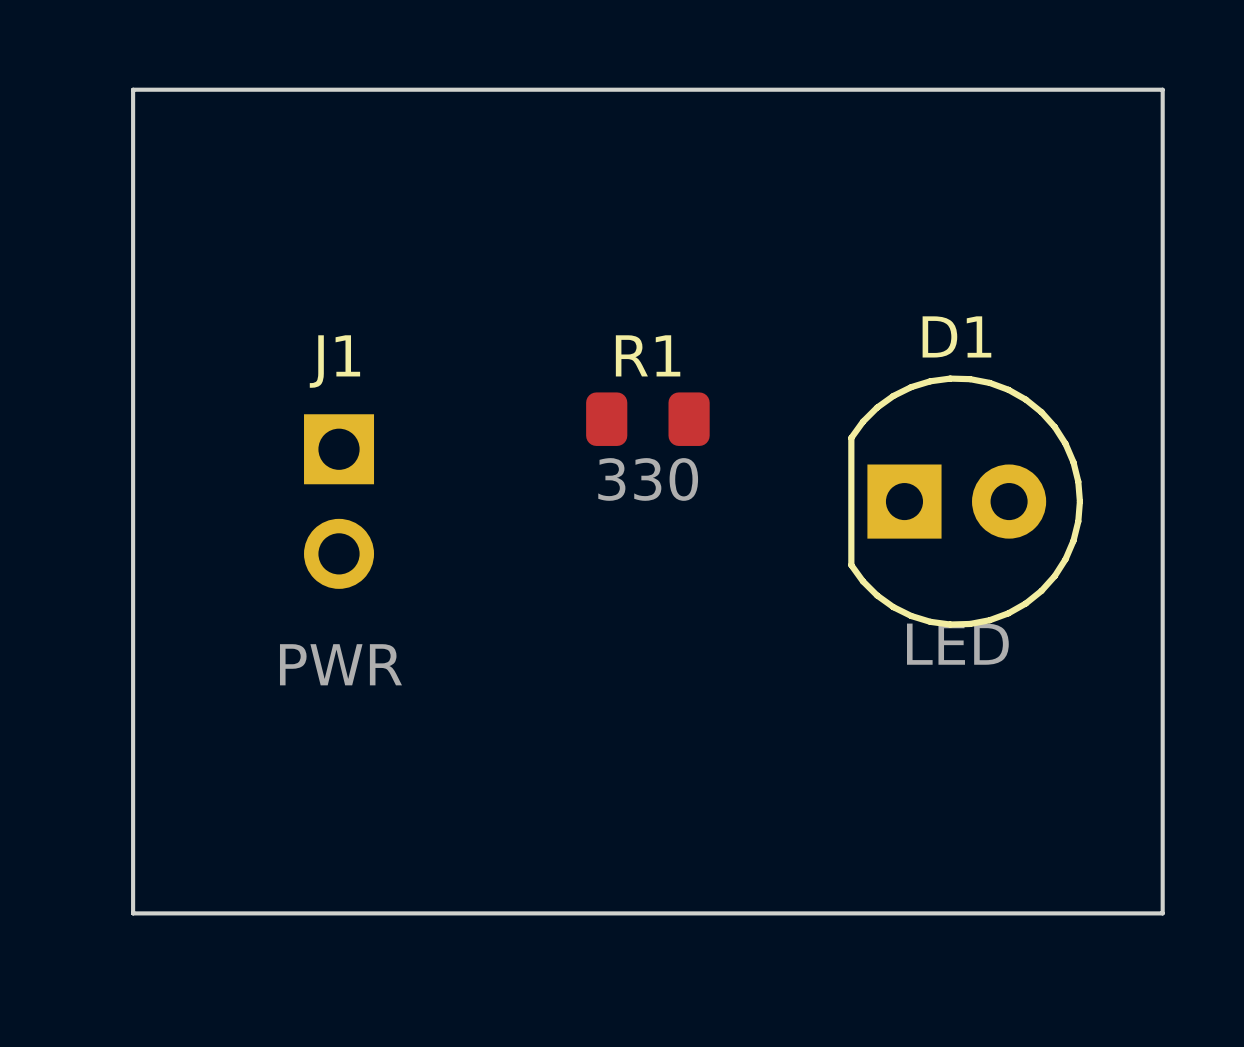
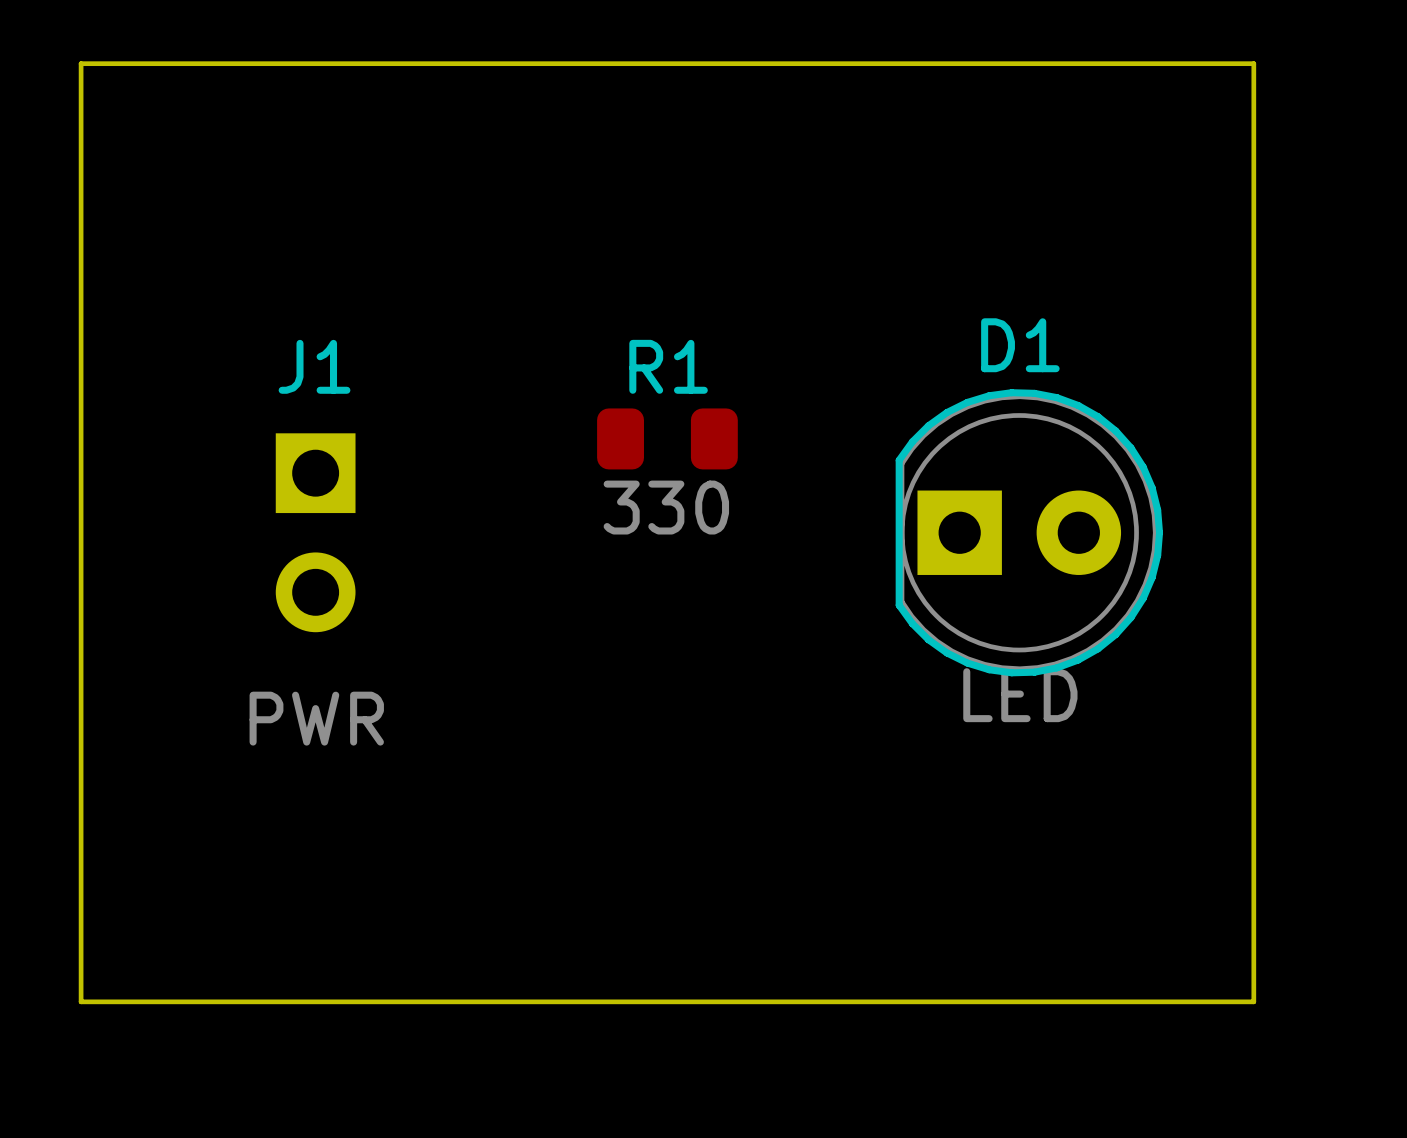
D1 footprint: [848, 375, 1084, 628] -> [895, 389, 1164, 677]

